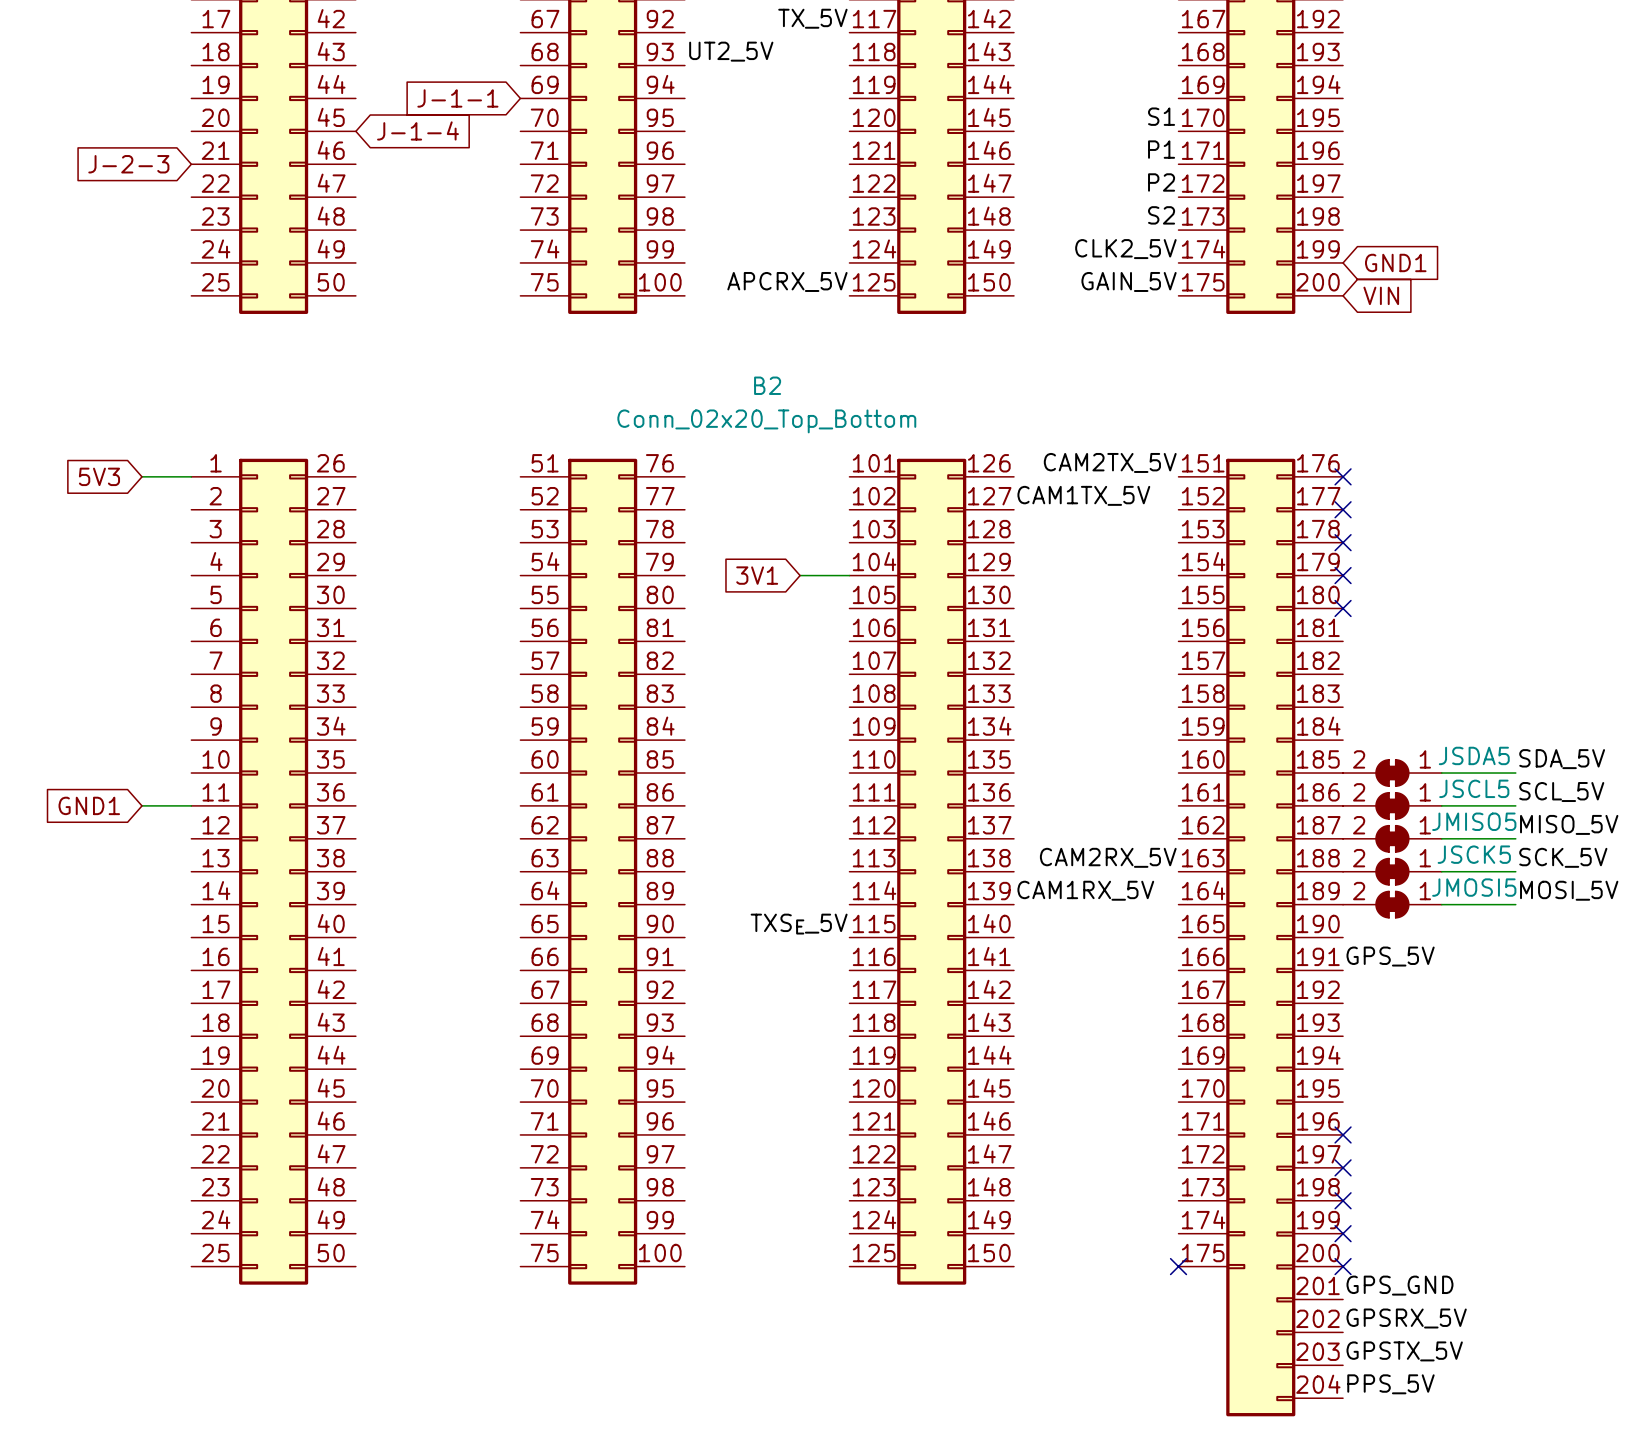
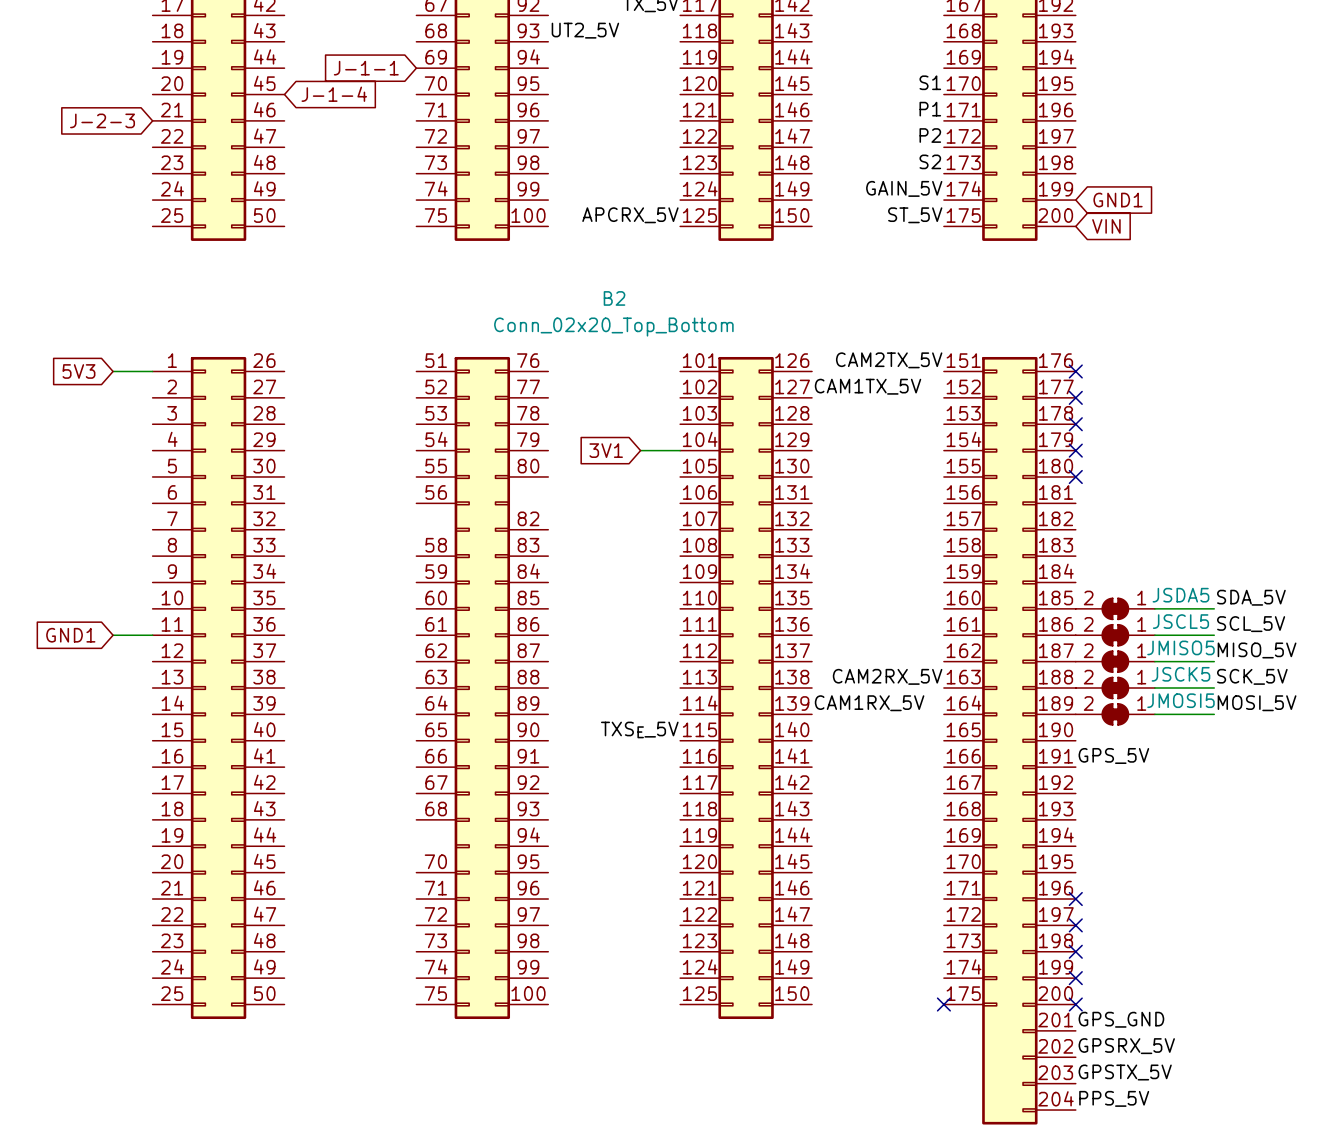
label: CLK2_5V (1125, 249) -> GAIN_5V (904, 188)
label: GAIN_5V (1129, 281) -> ST_5V (915, 215)
B2 symbol: [191, 458, 1344, 1417] -> [152, 356, 1076, 1125]

